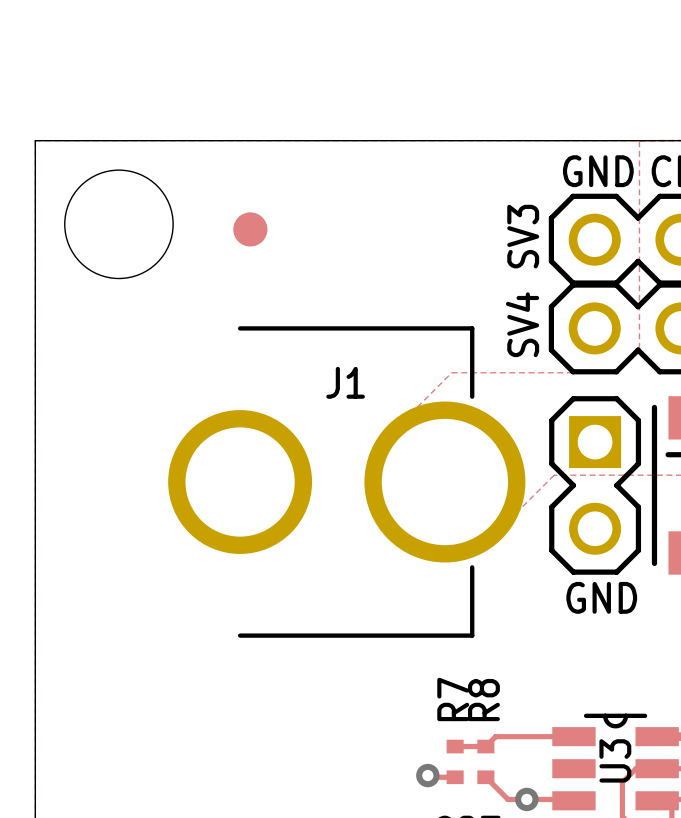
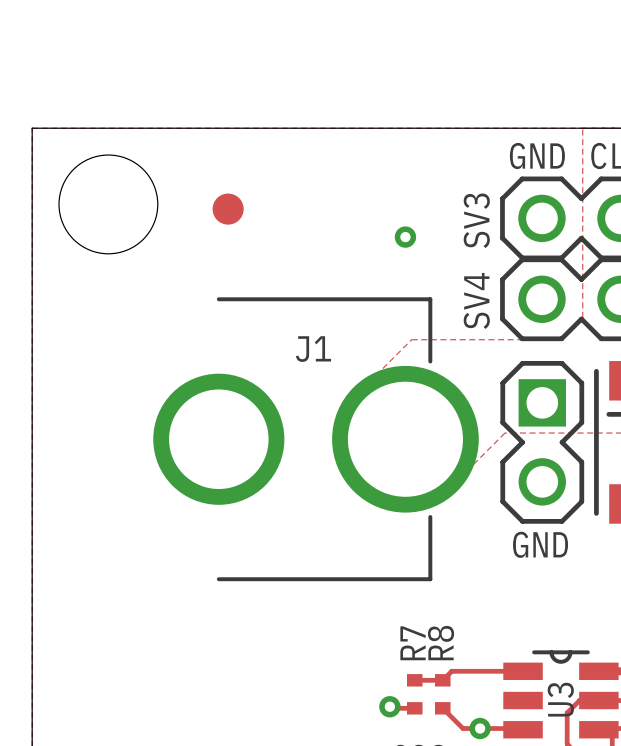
via: none -> (405, 237)

